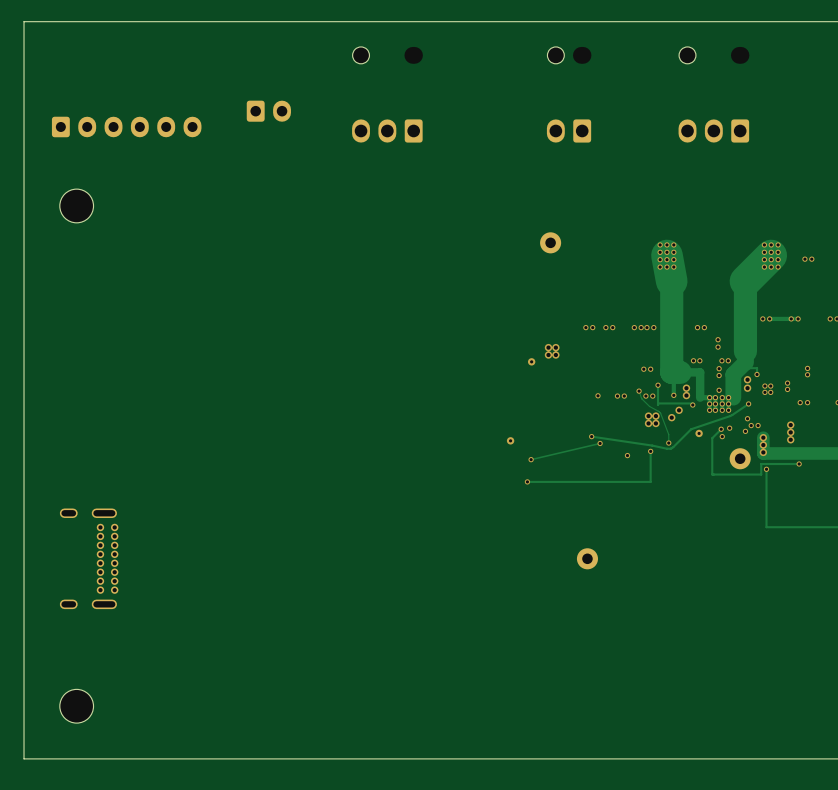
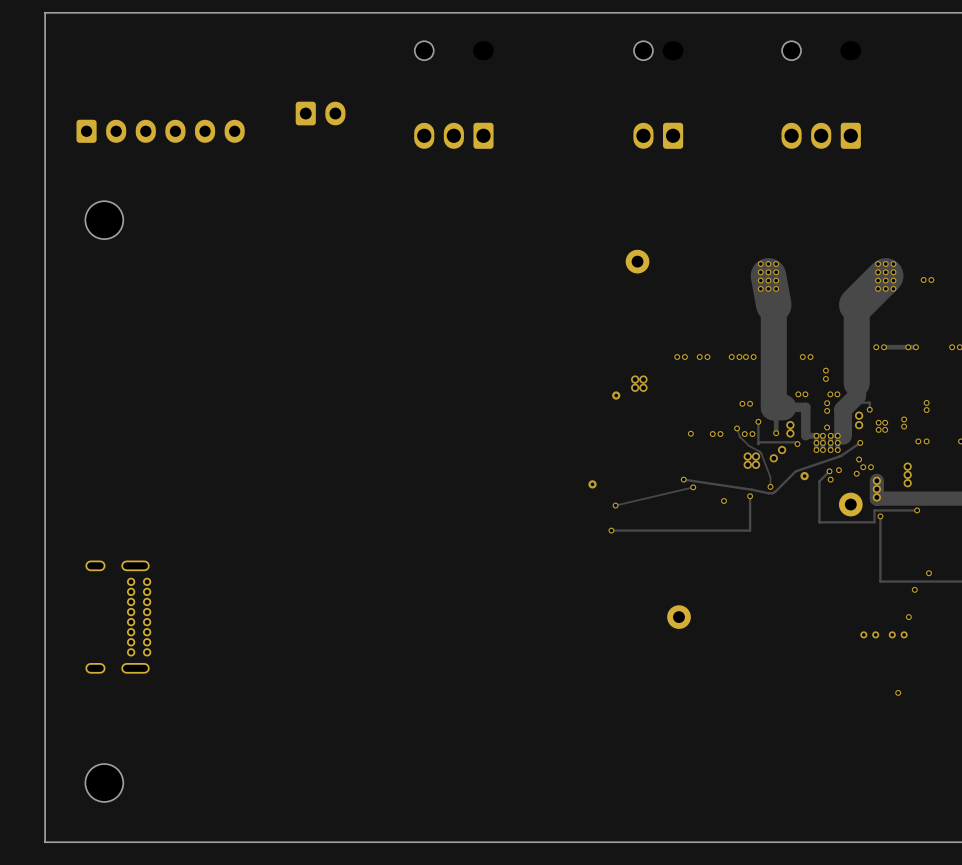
via: none -> (929, 573)
via: none -> (914, 589)
via: none -> (908, 617)
via: none -> (863, 634)
via: none -> (875, 634)
via: none -> (892, 634)
via: none -> (904, 634)
via: none -> (898, 692)

